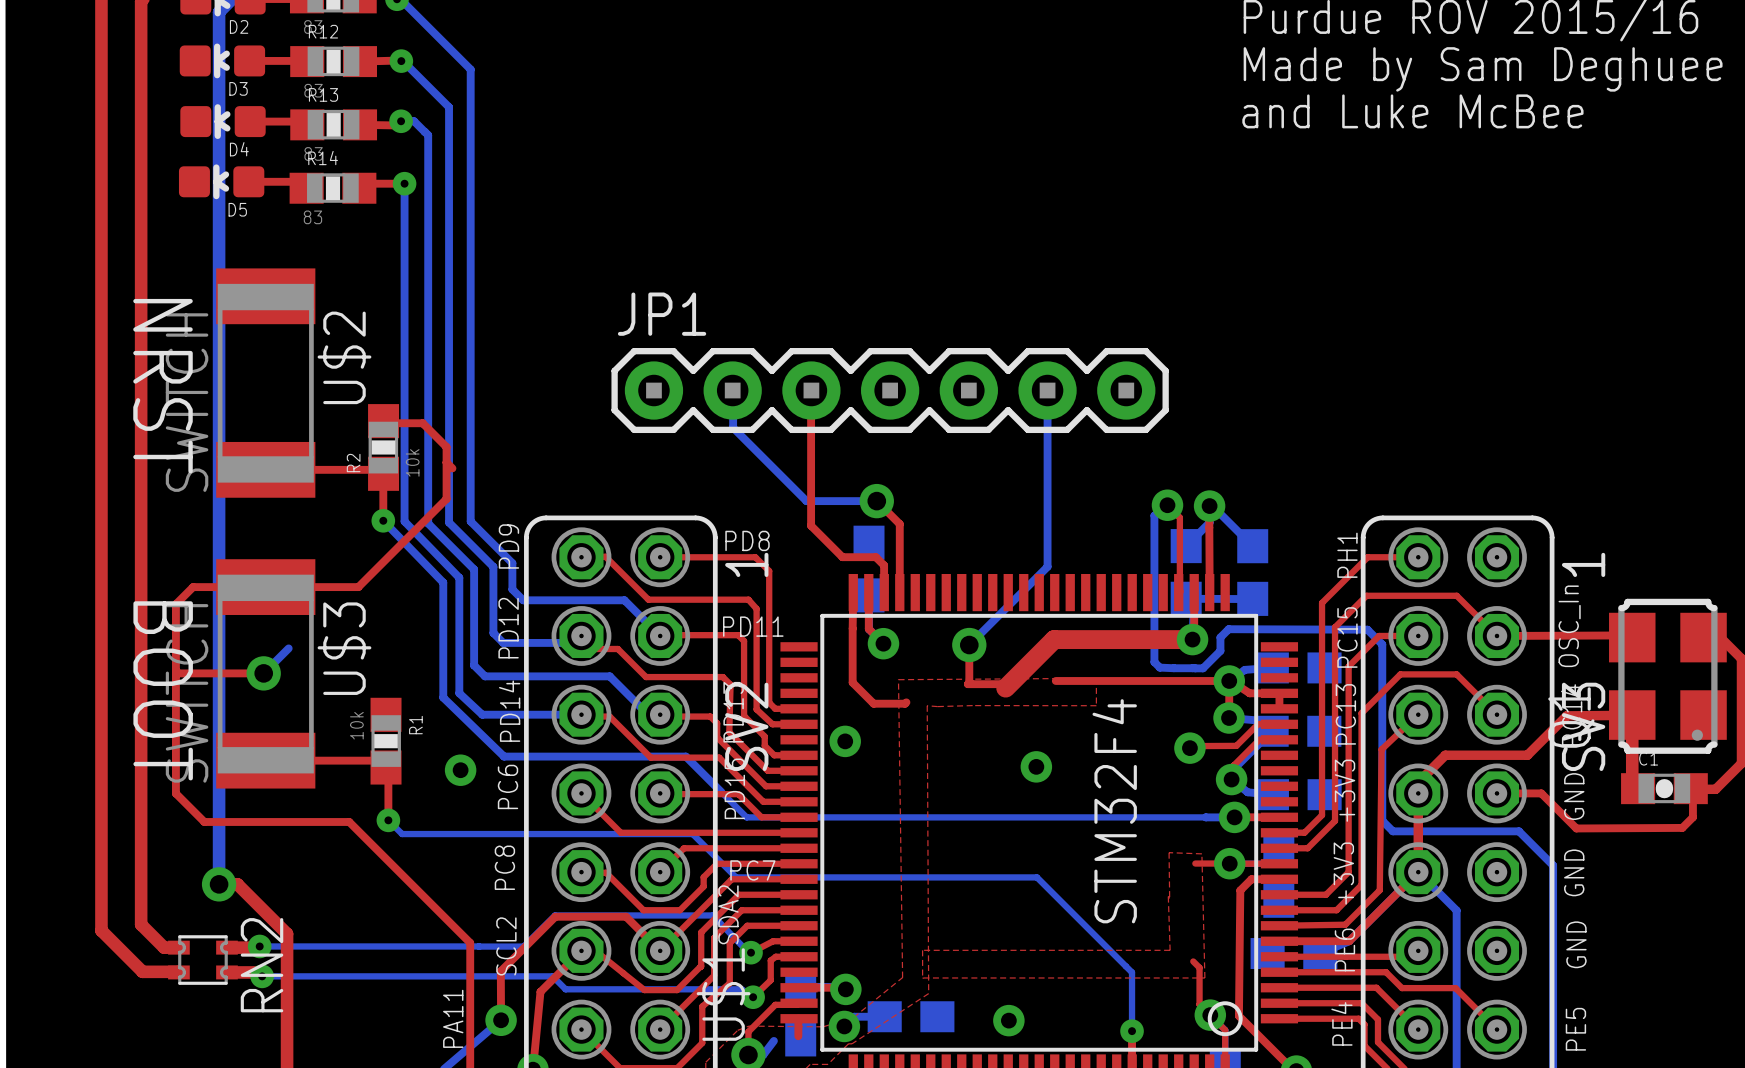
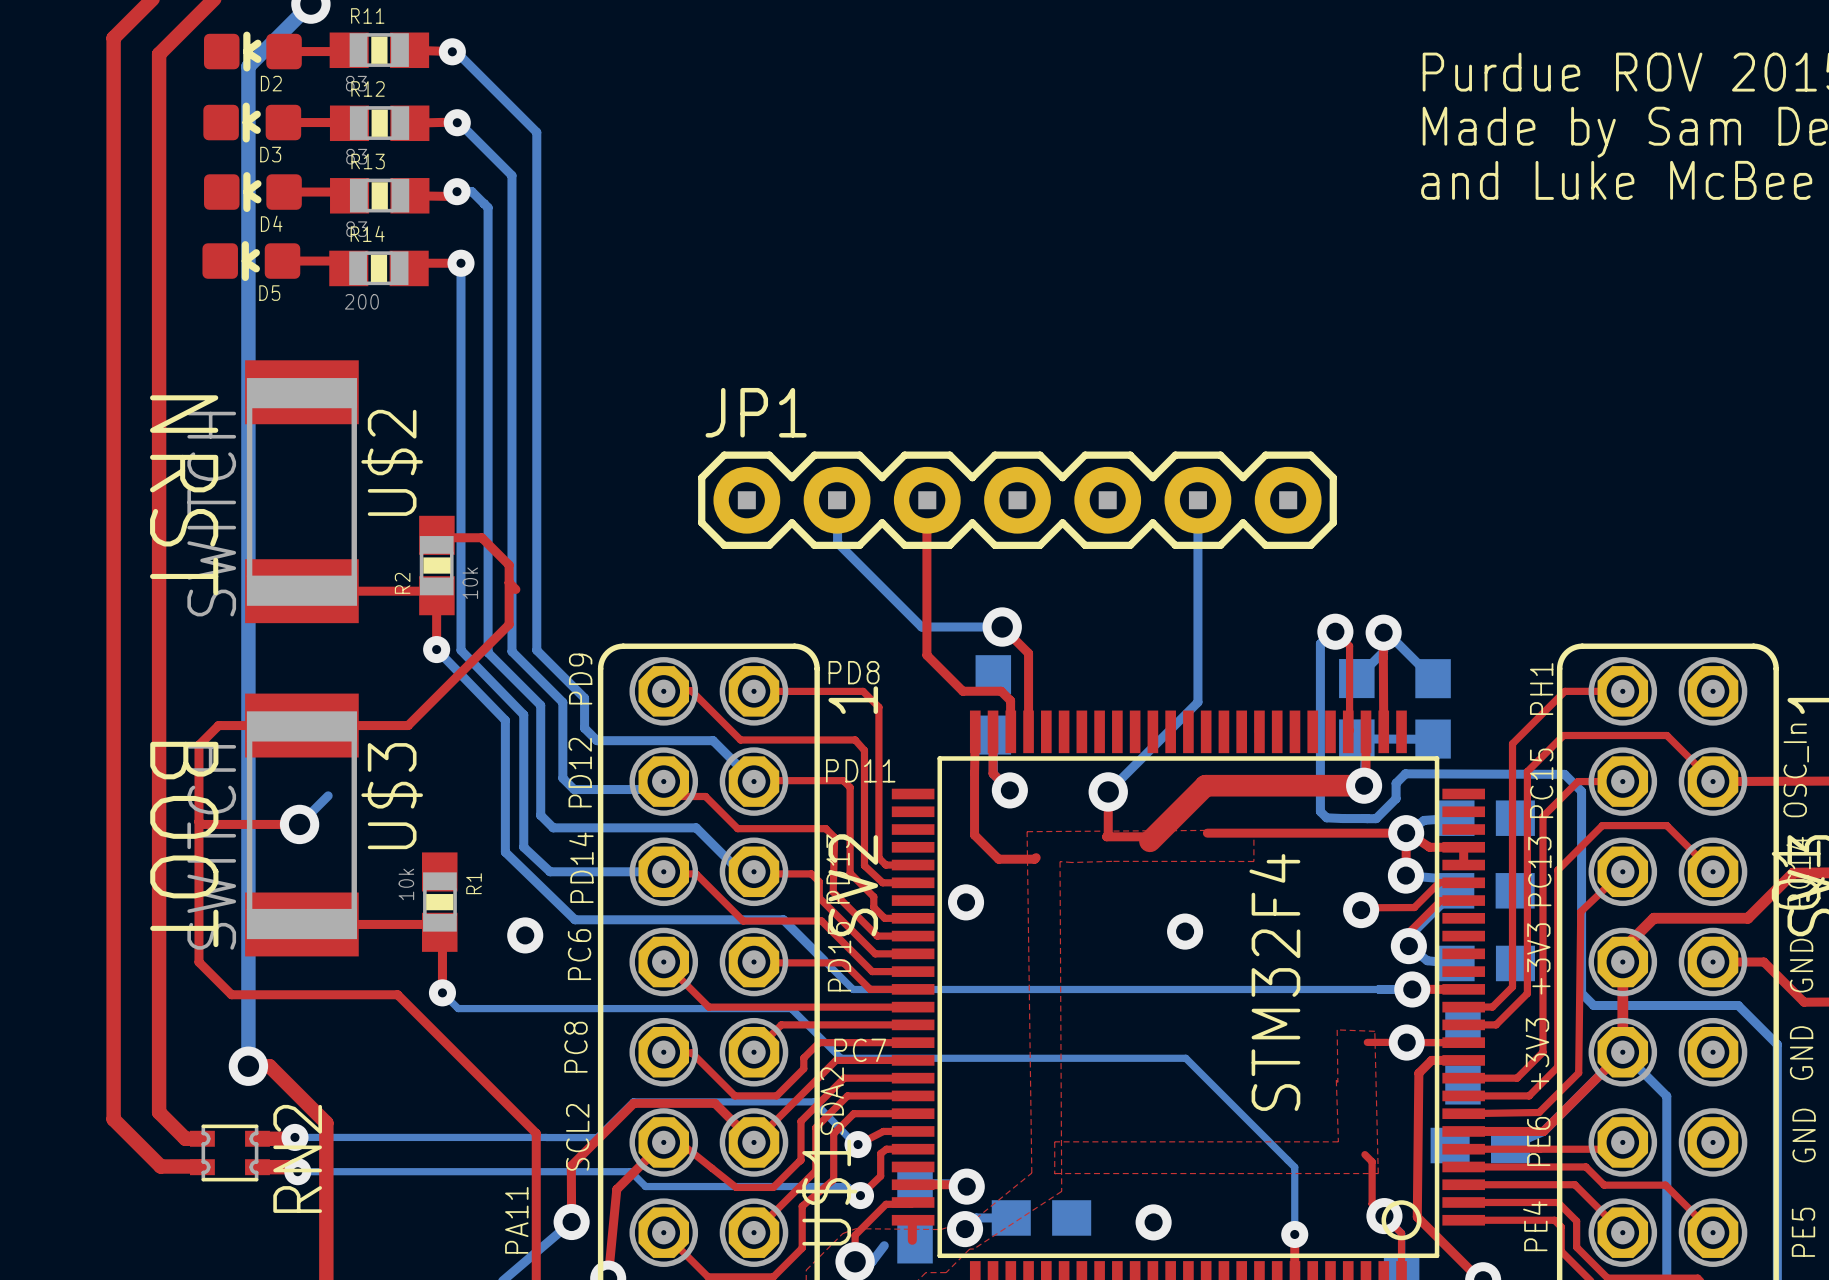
R14 value: 83 (312, 217) -> 200 (361, 301)

